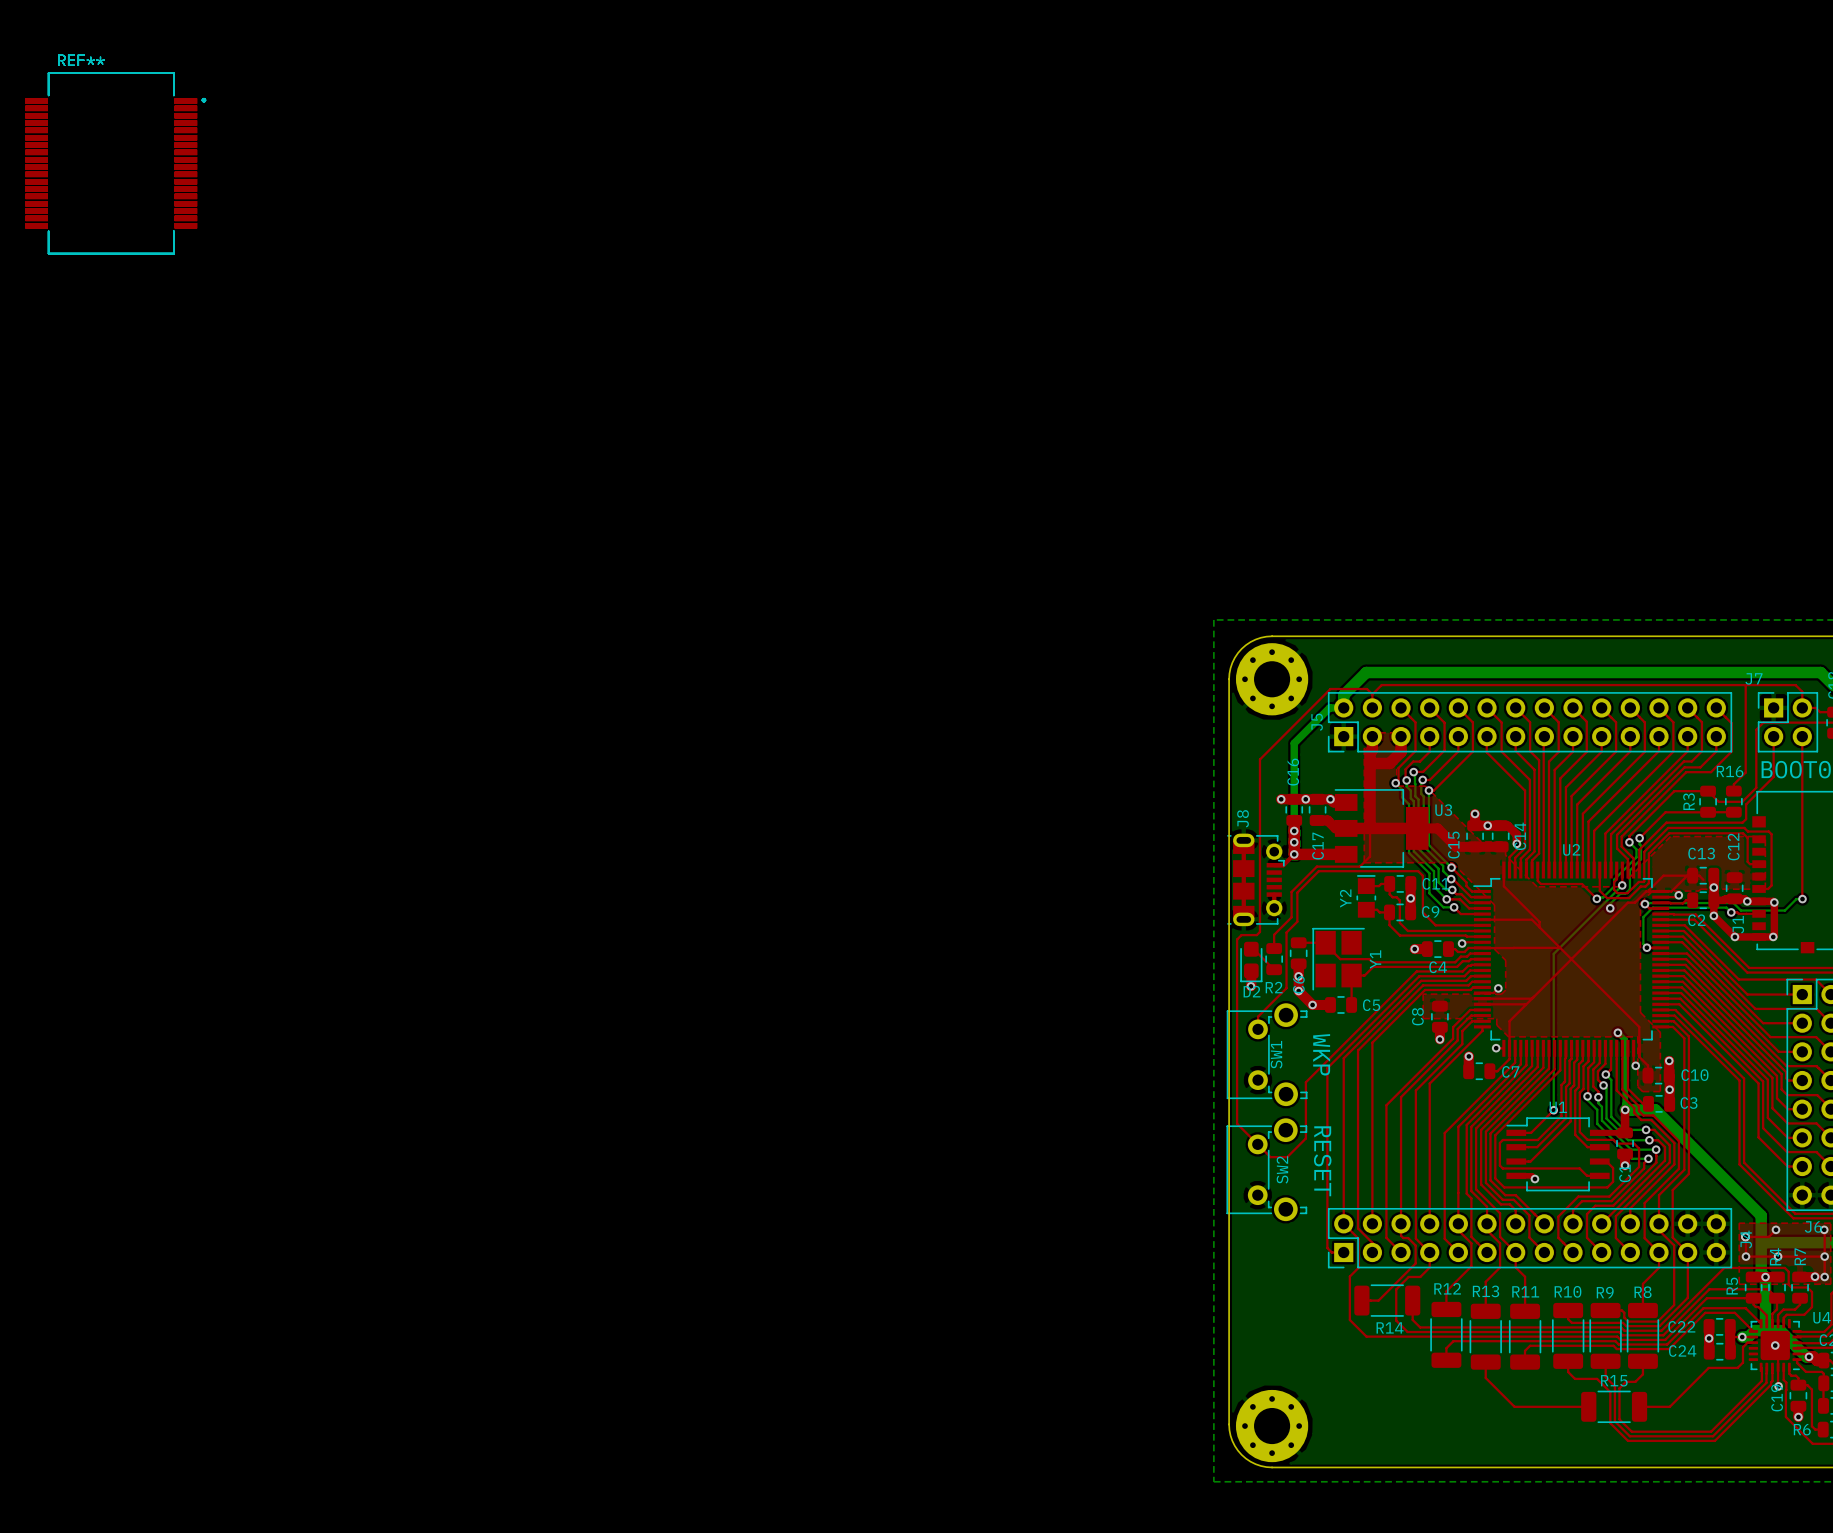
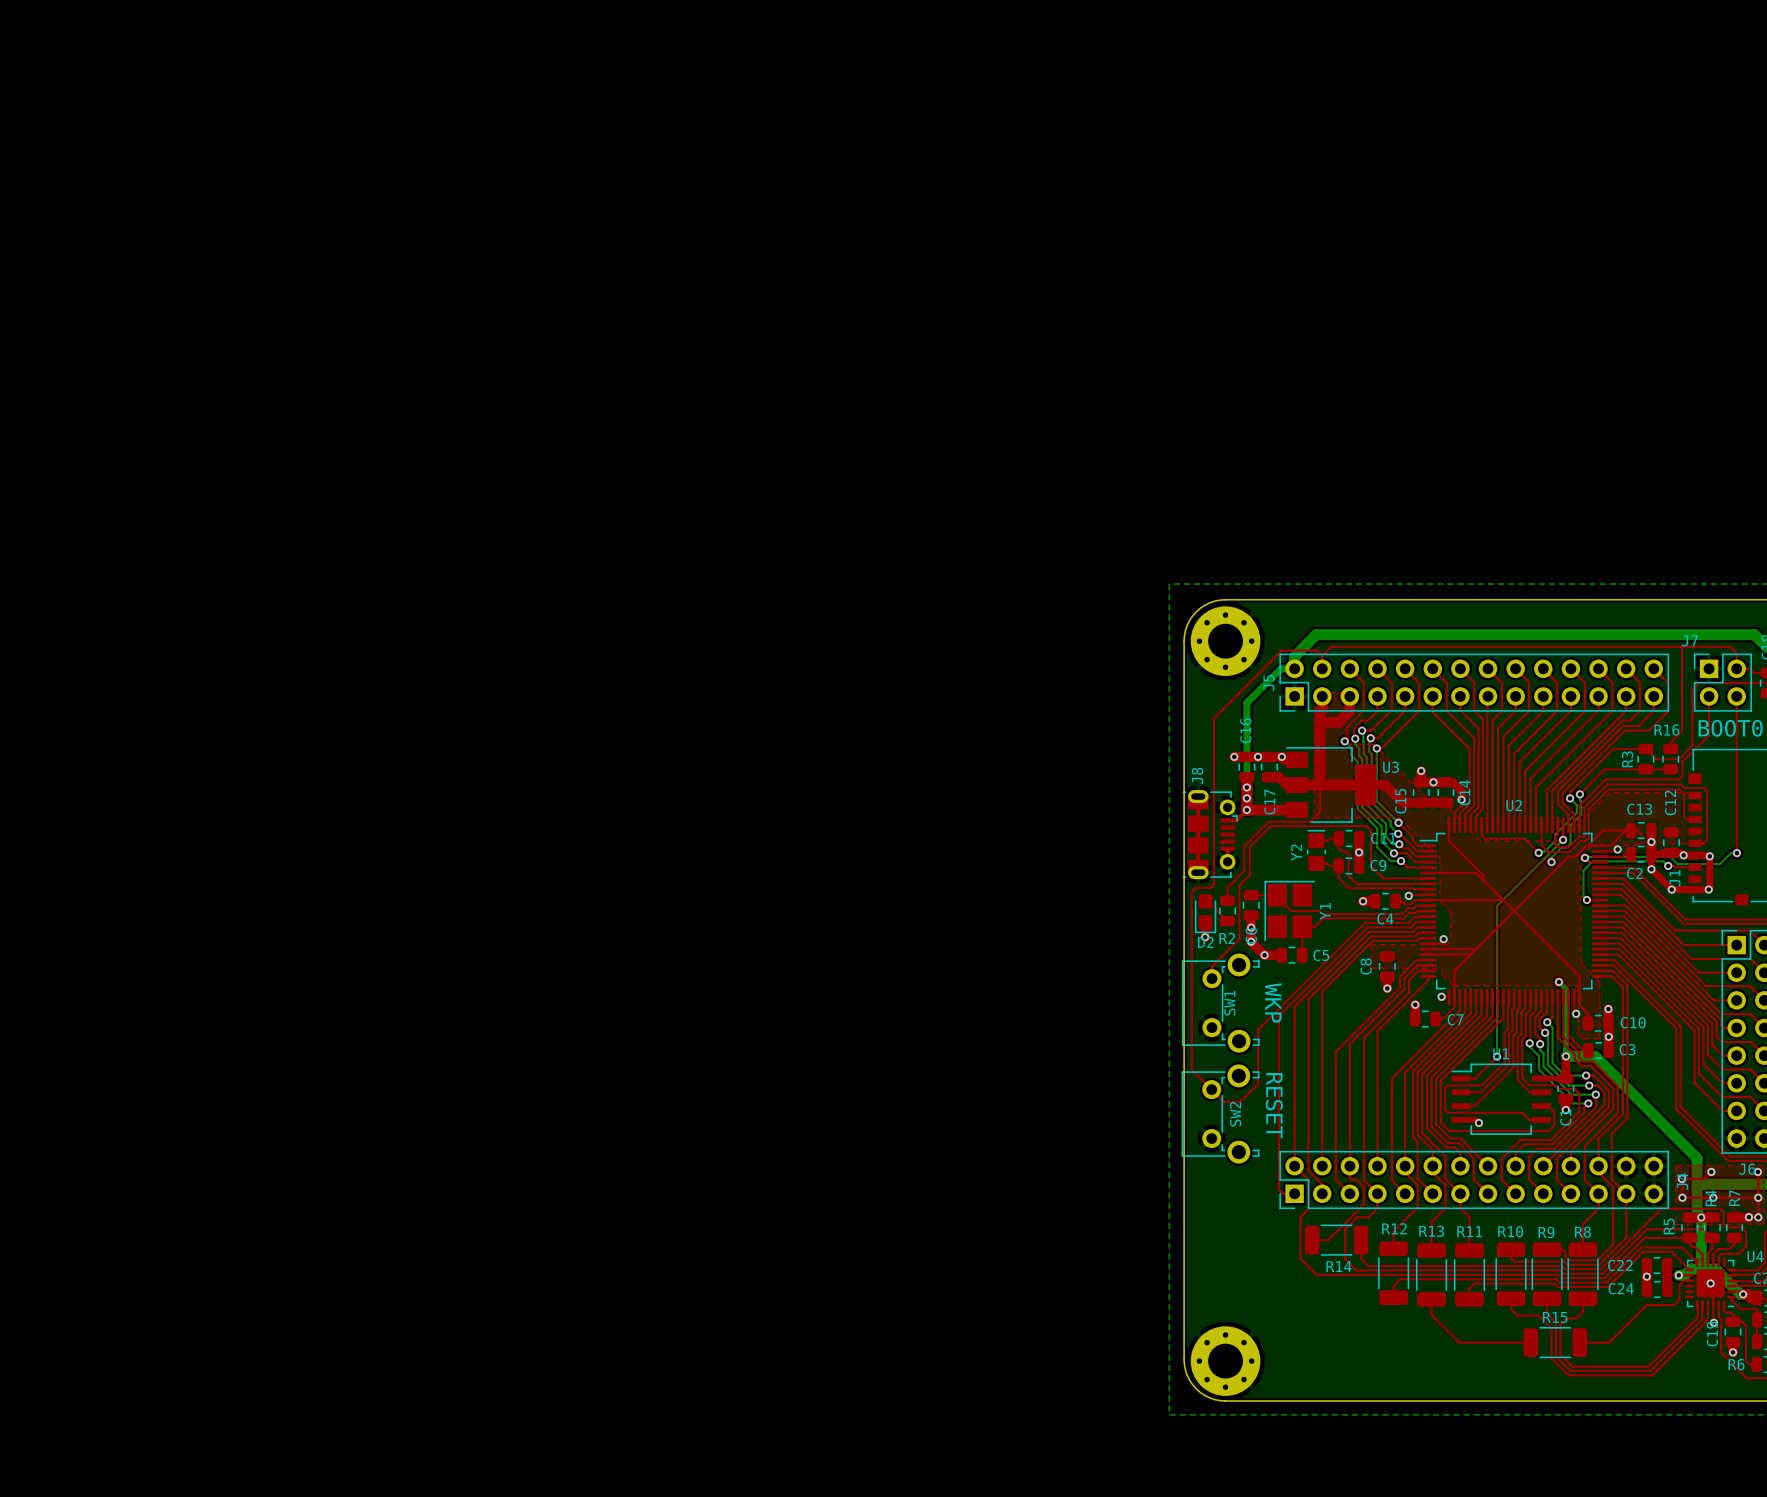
REF**: (115, 163) -> none

